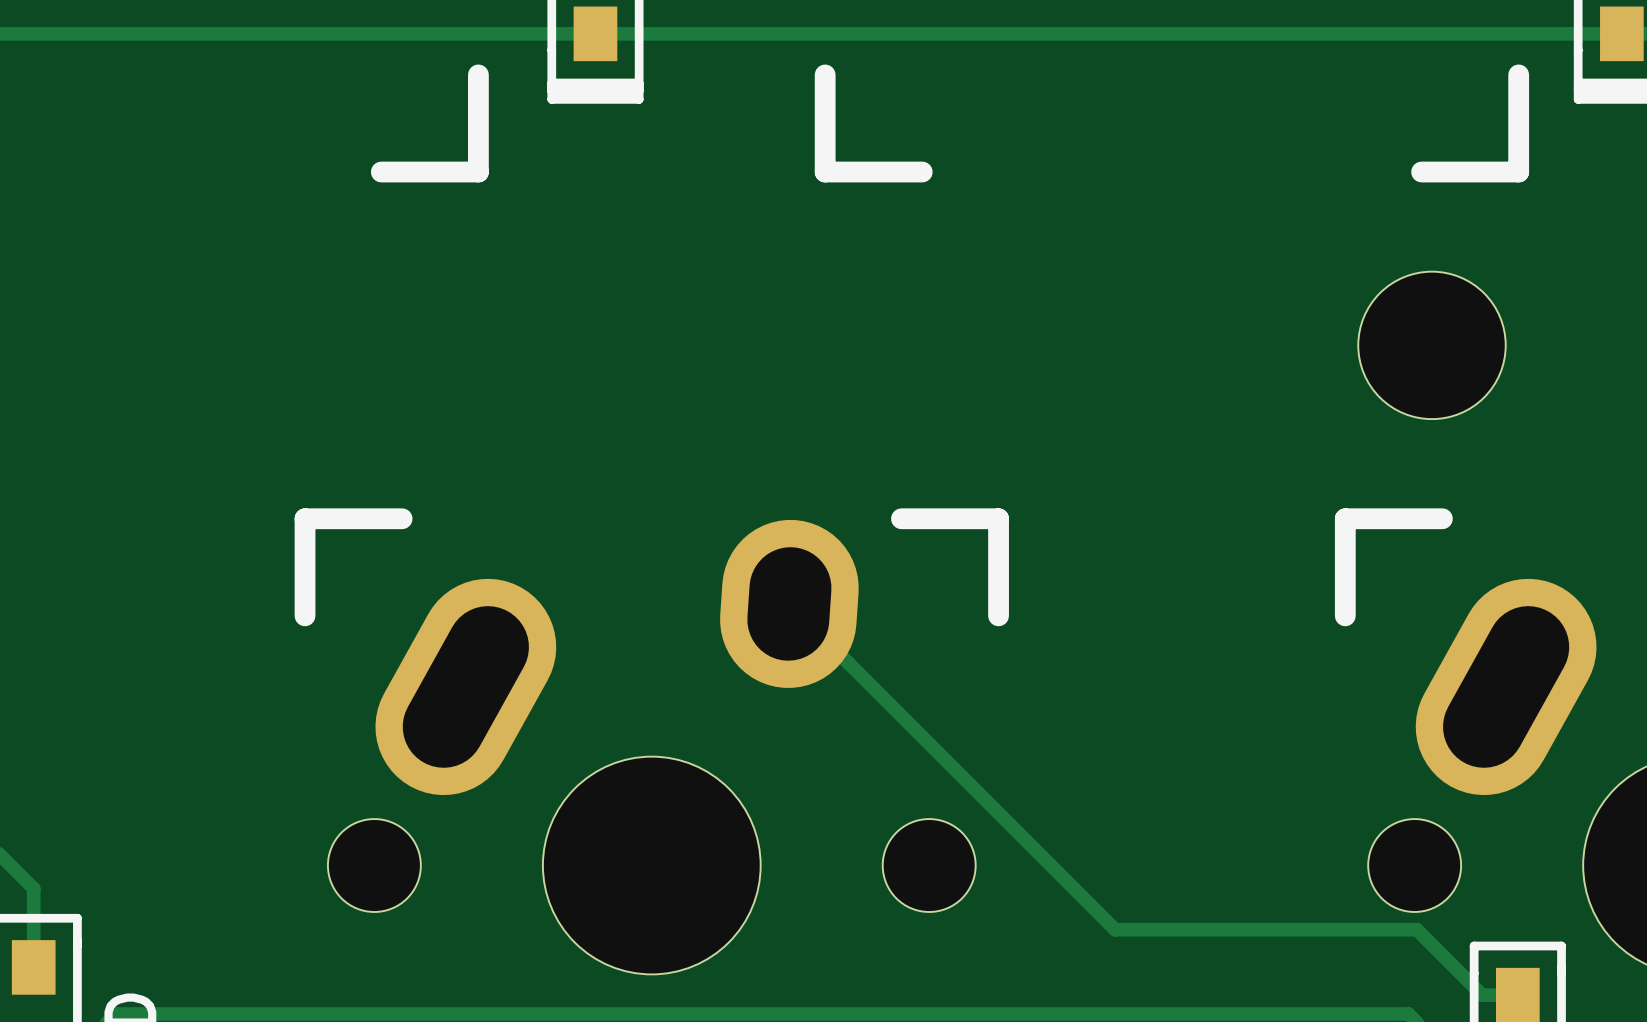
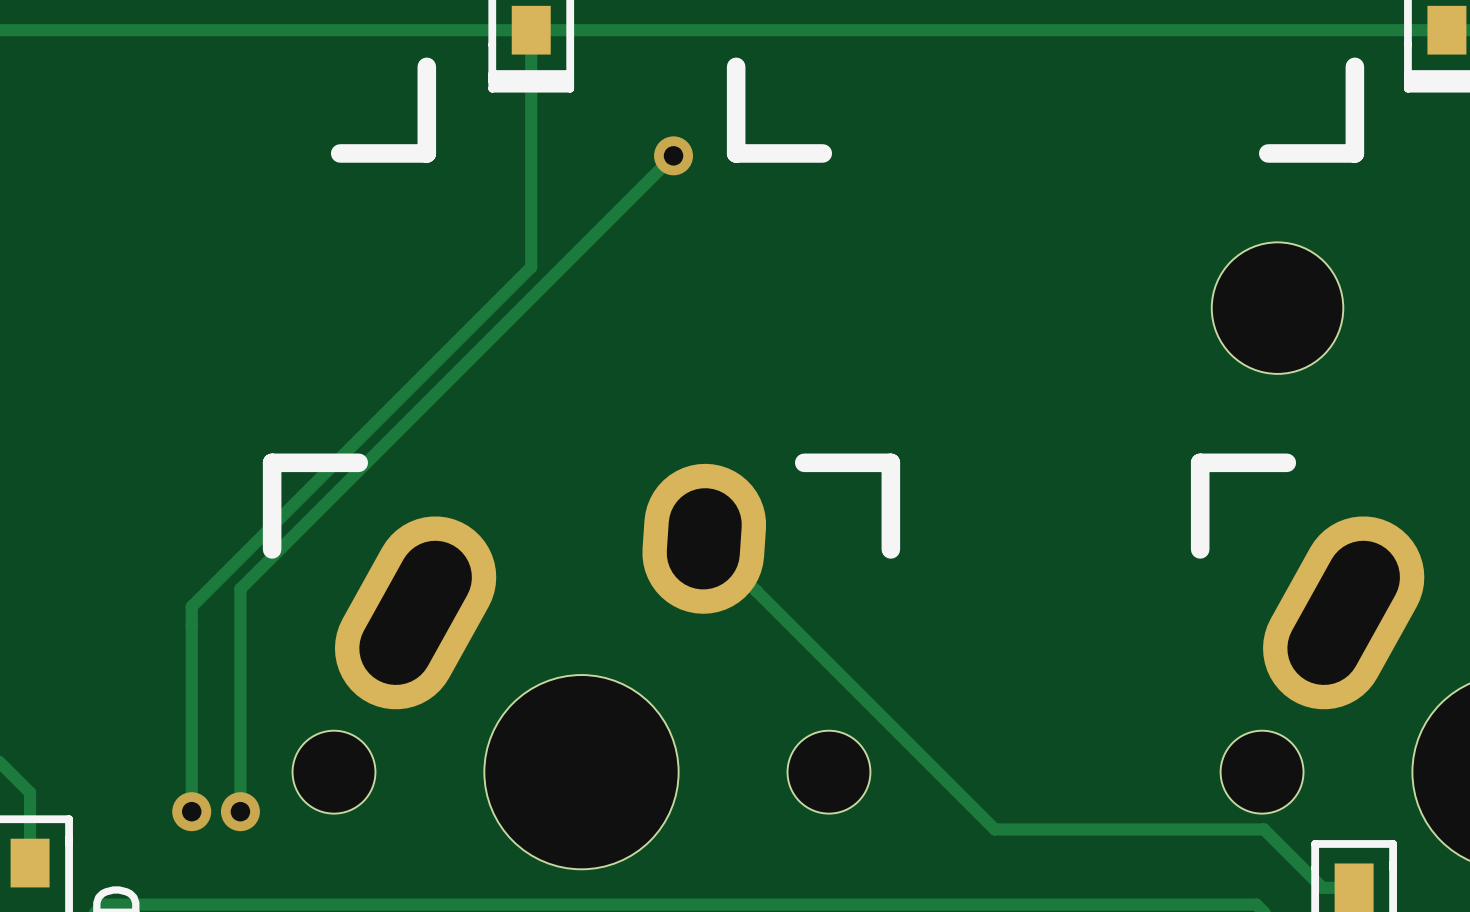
track: none -> (531, 30) (531, 267) (191, 606) (191, 811)
track: none -> (673, 155) (240, 588) (240, 811)
via: none -> (673, 155)
via: none -> (191, 811)
via: none -> (240, 811)

